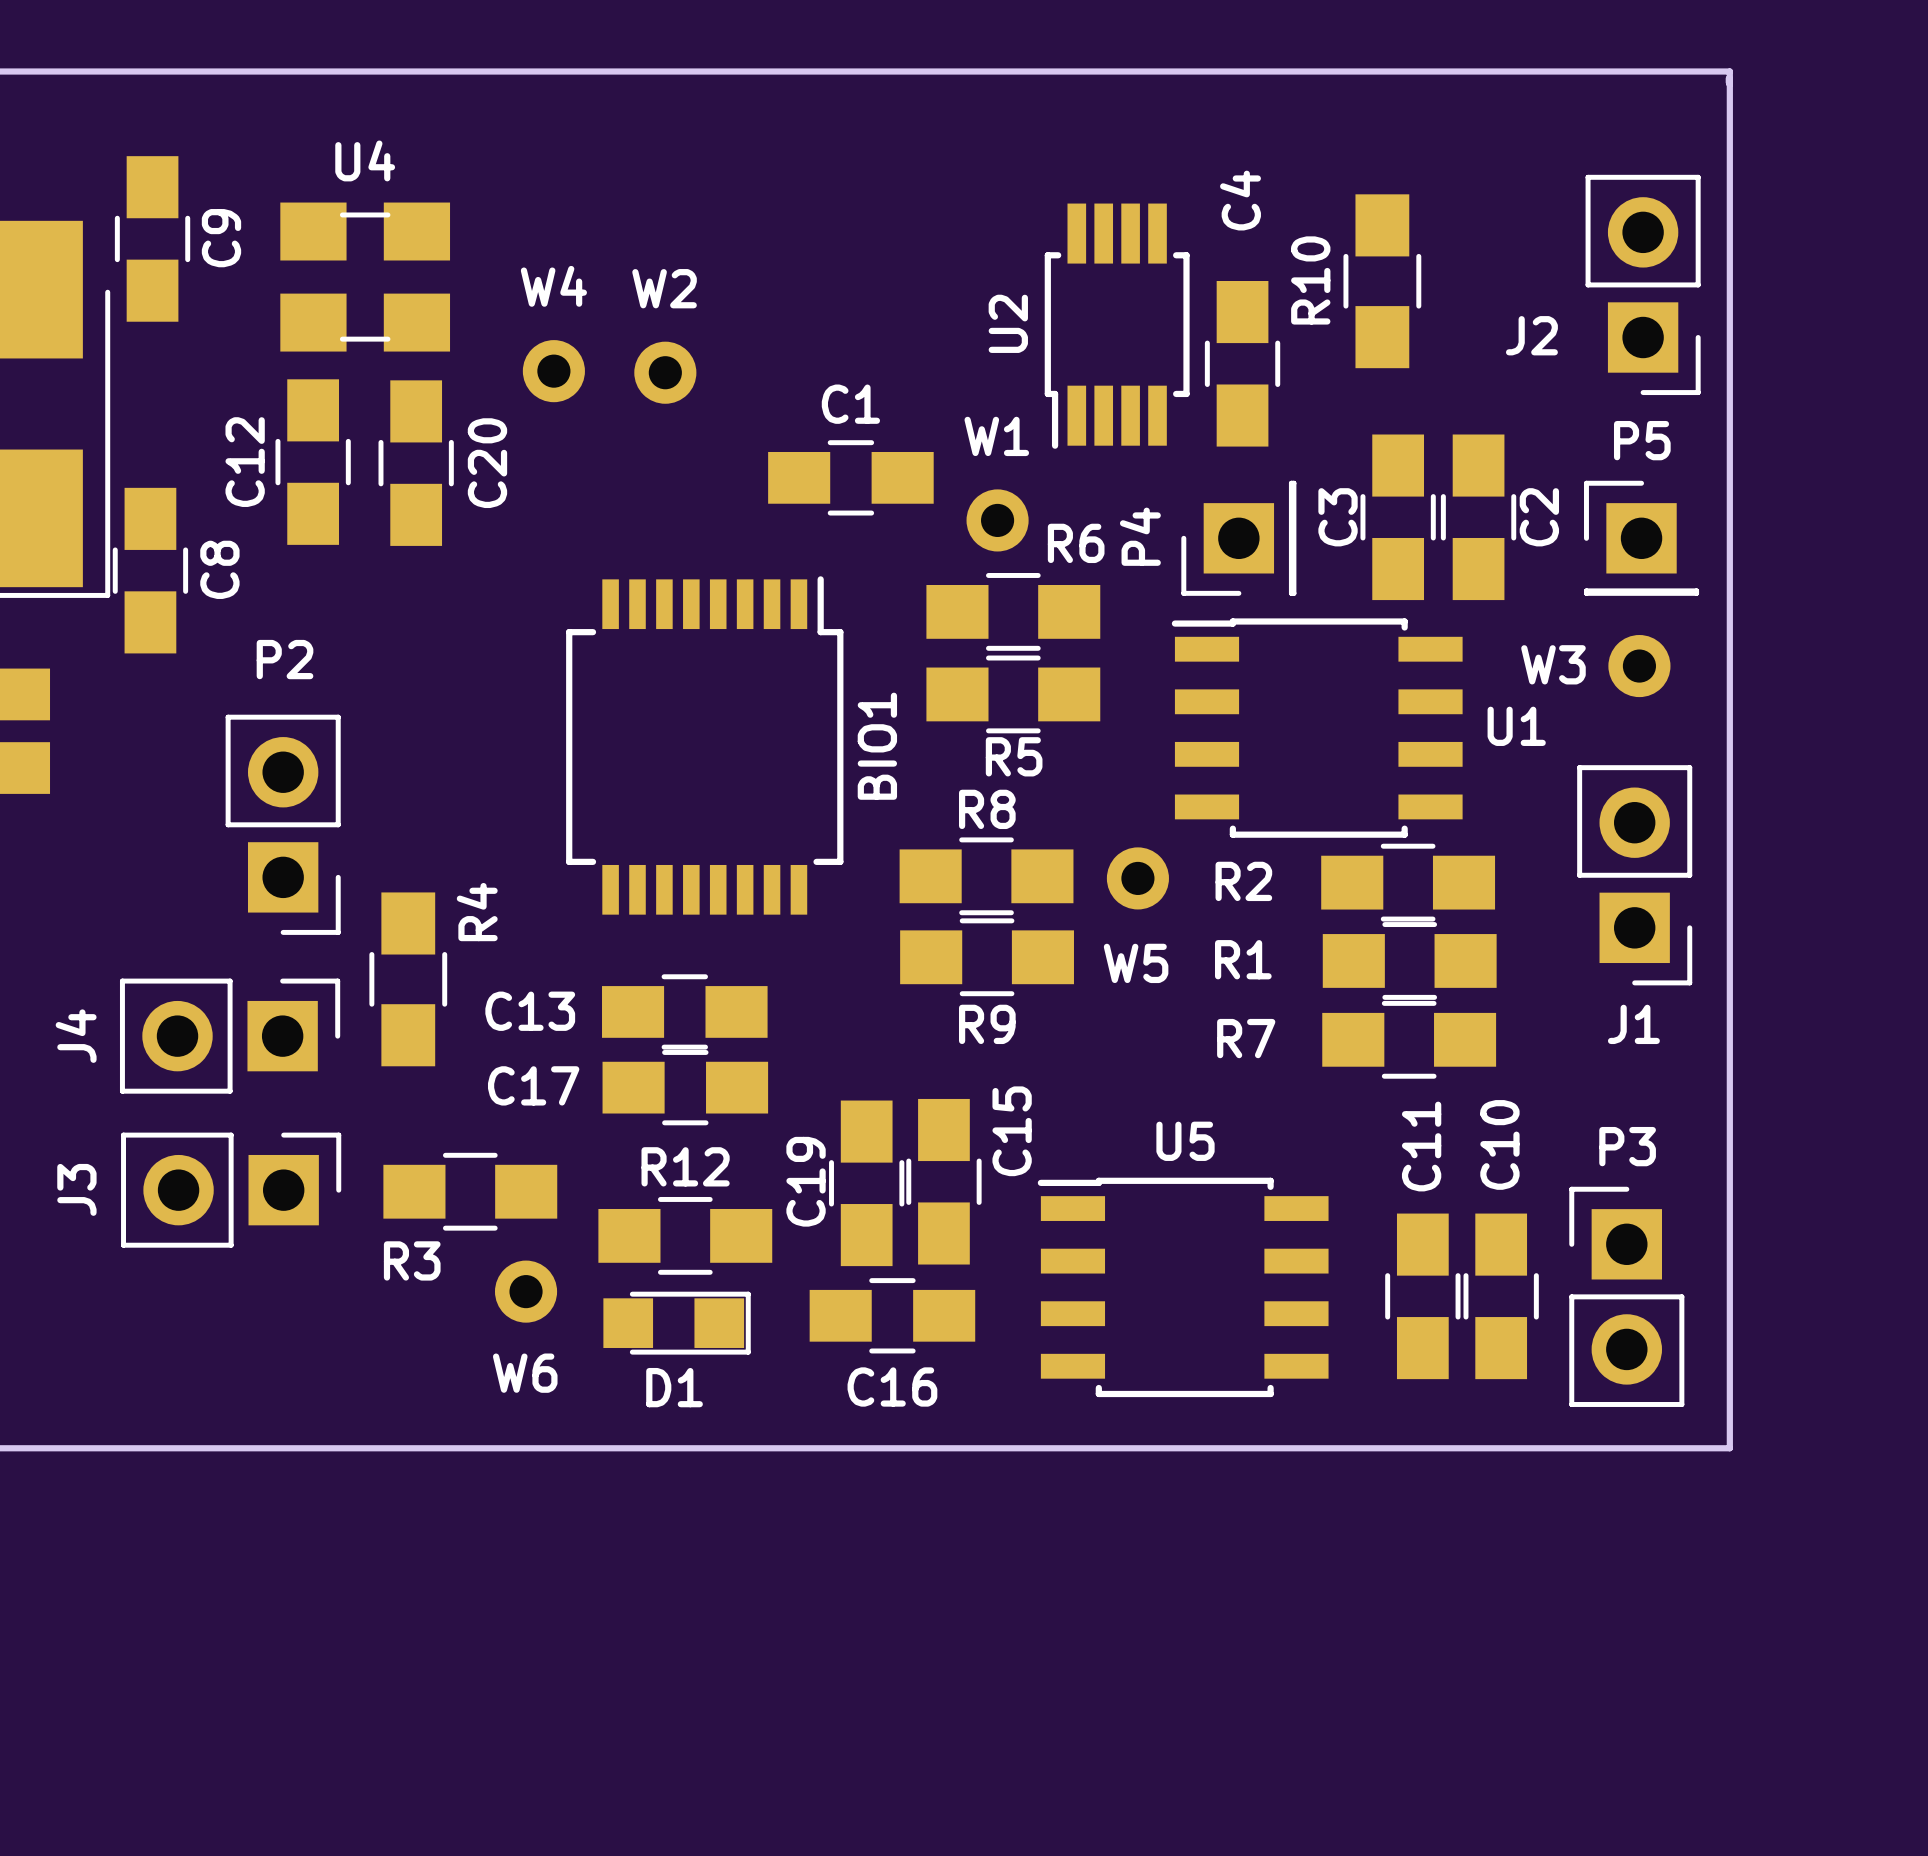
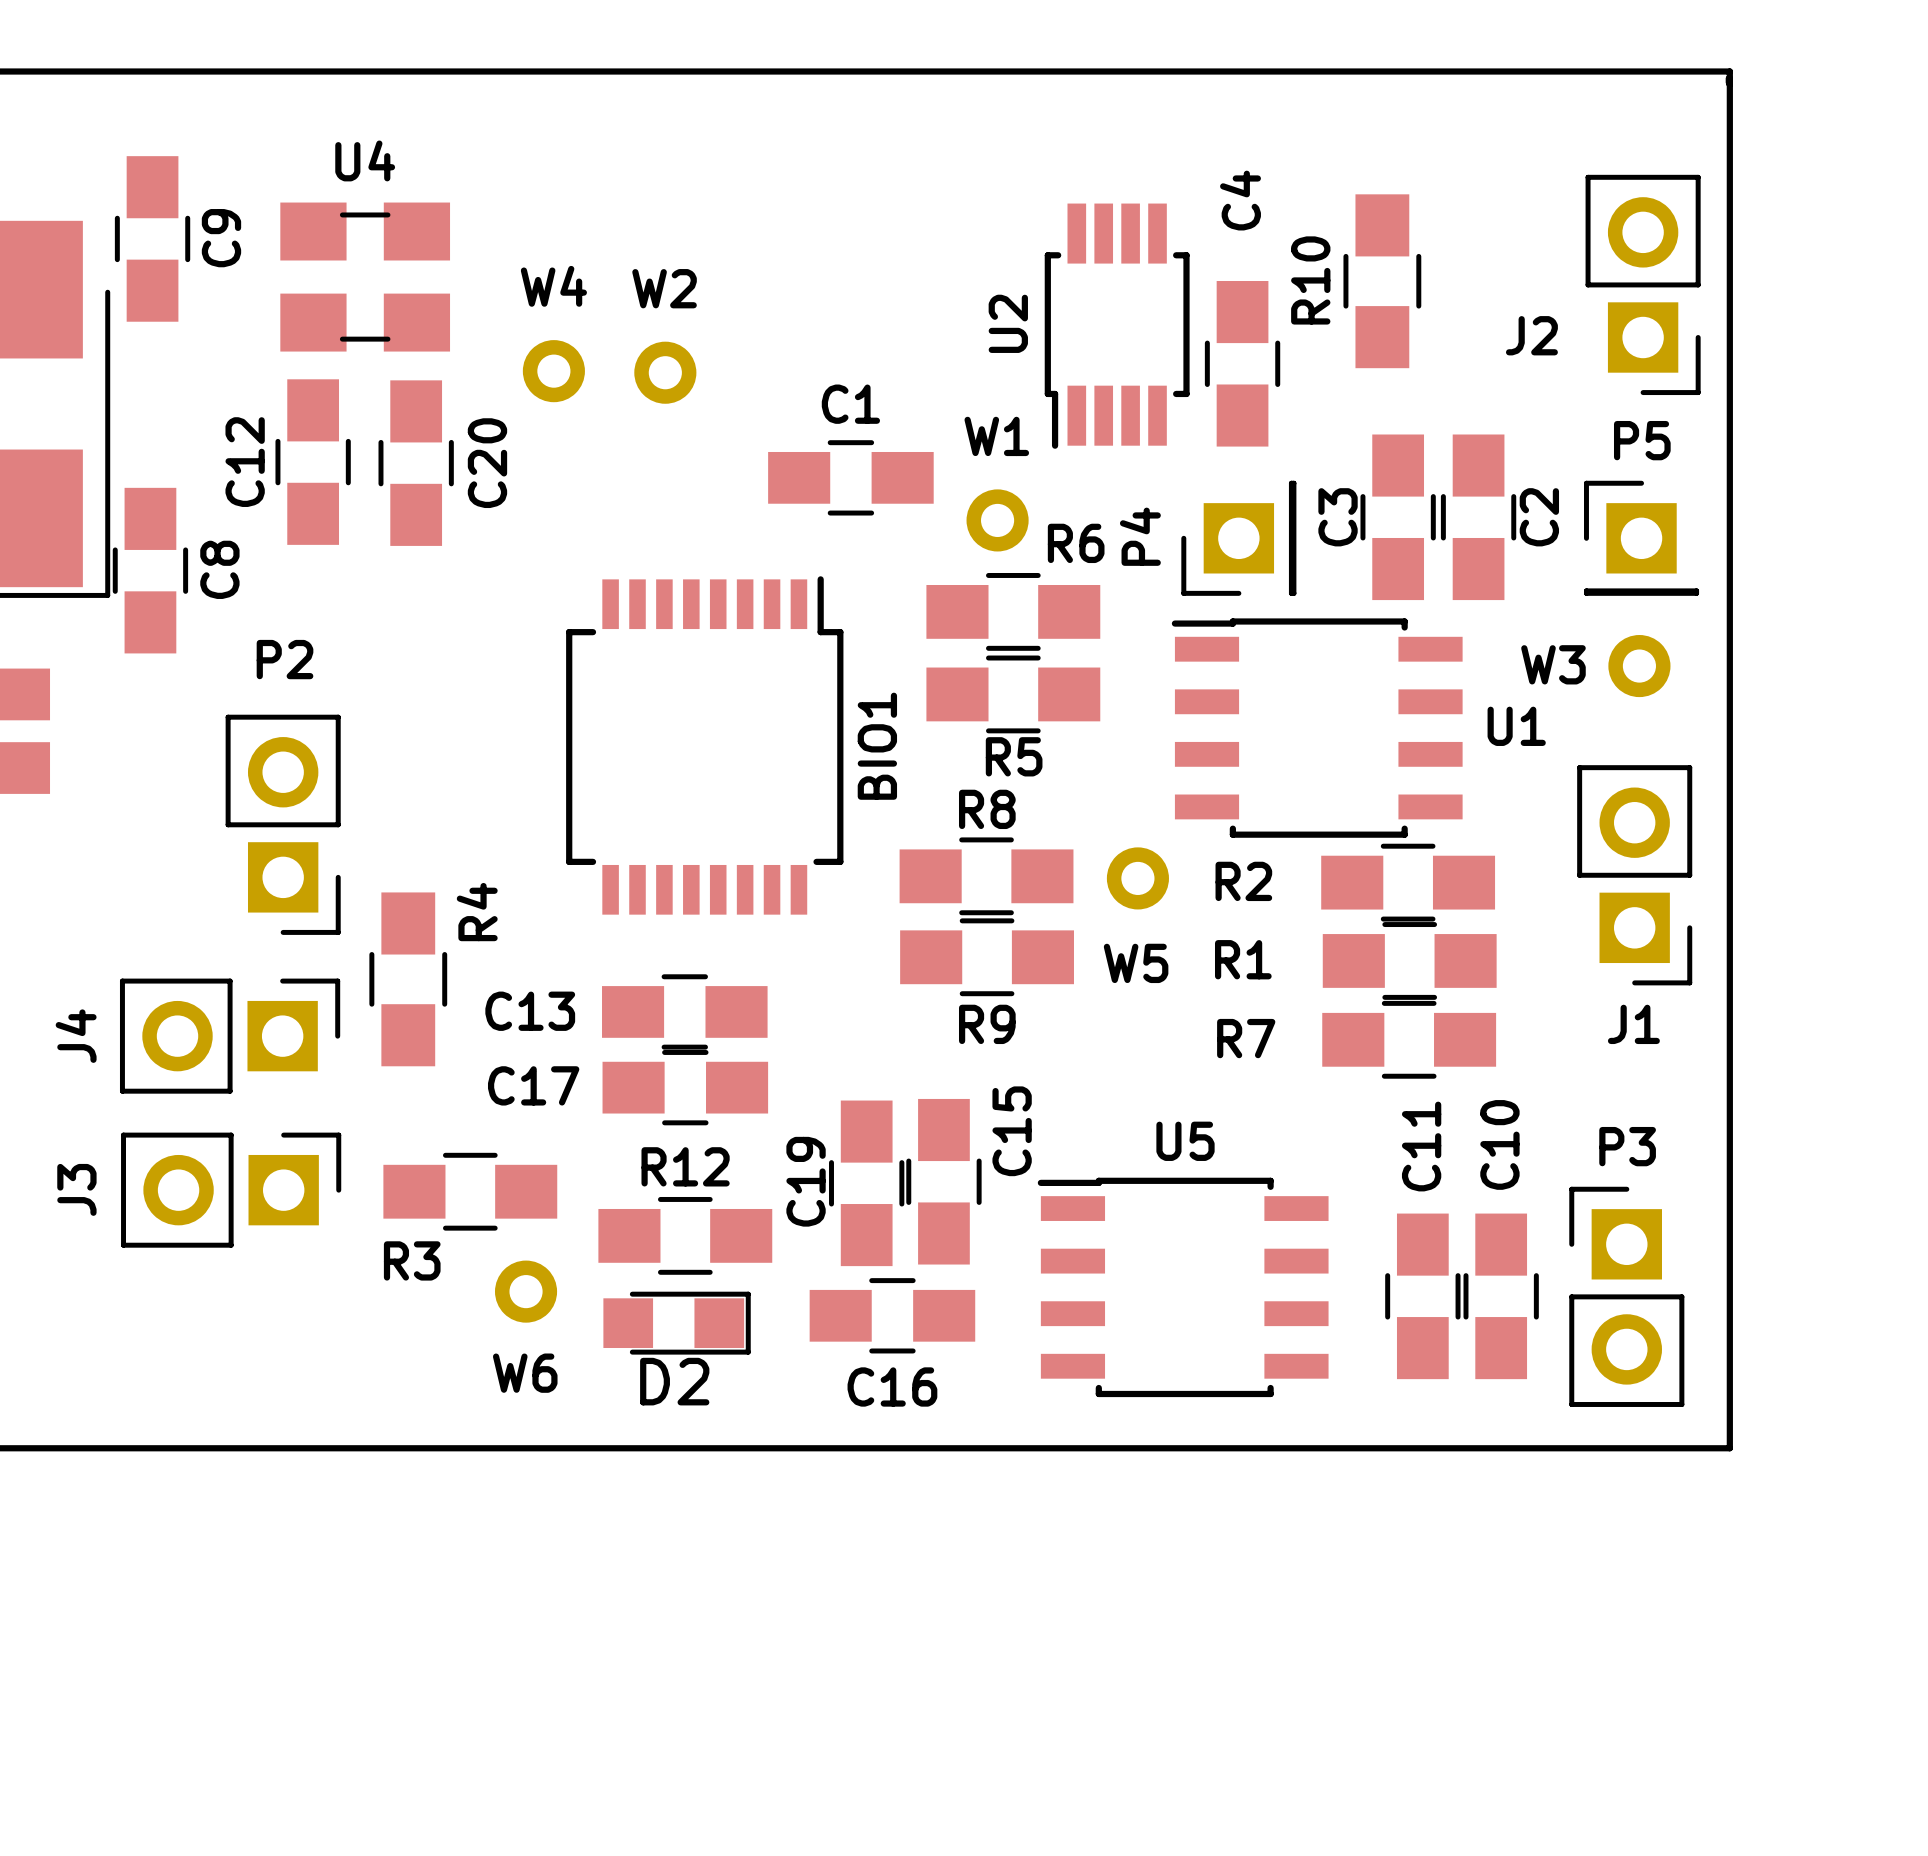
D1 name: D1 (674, 1387) -> D2 (674, 1381)

